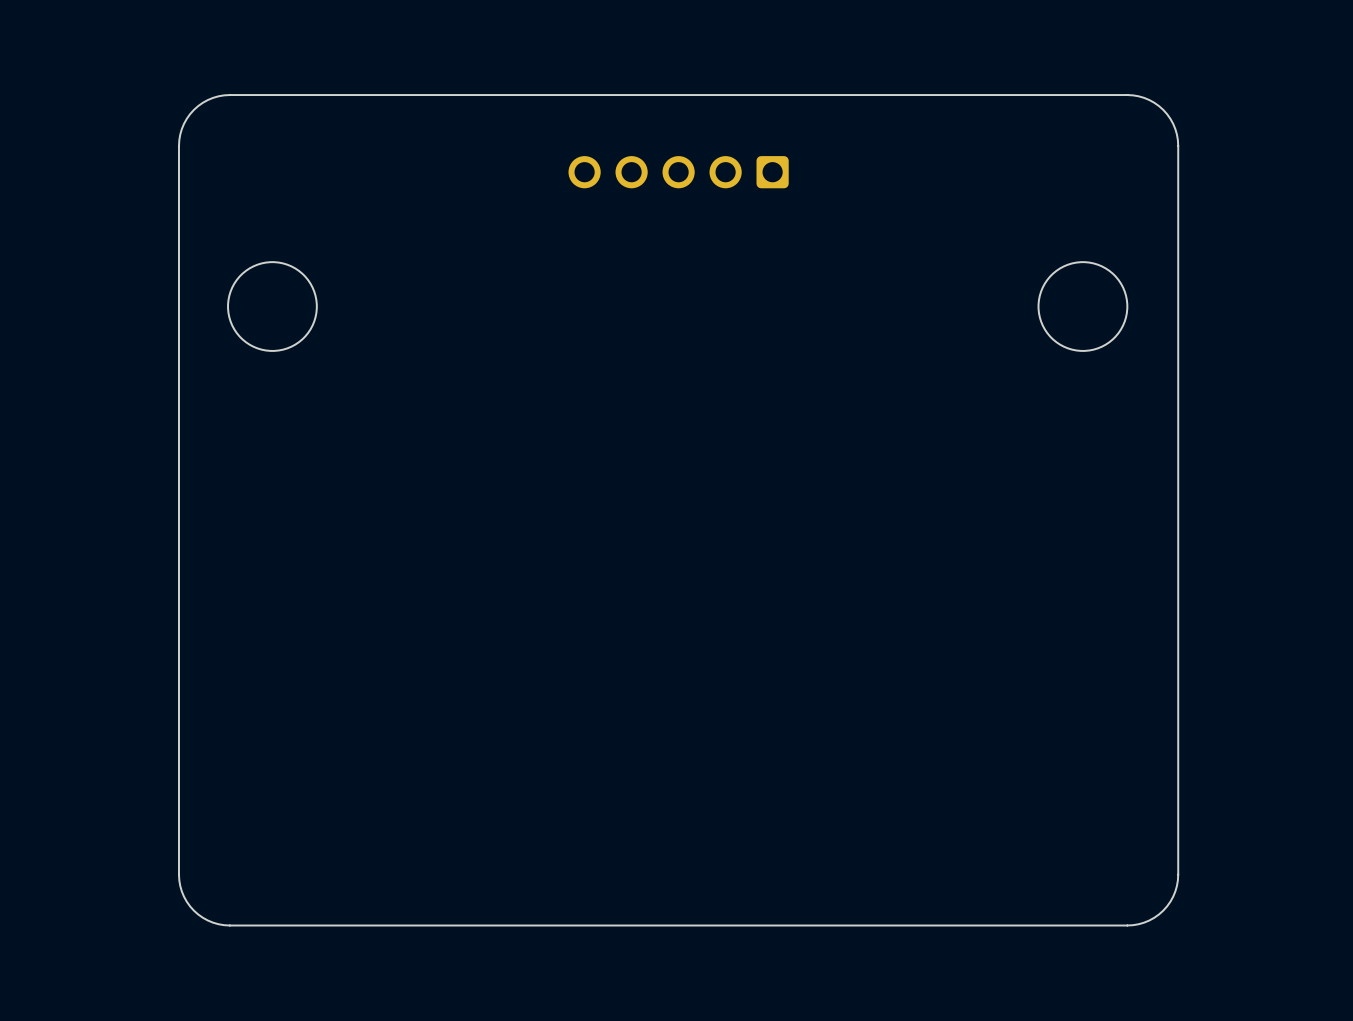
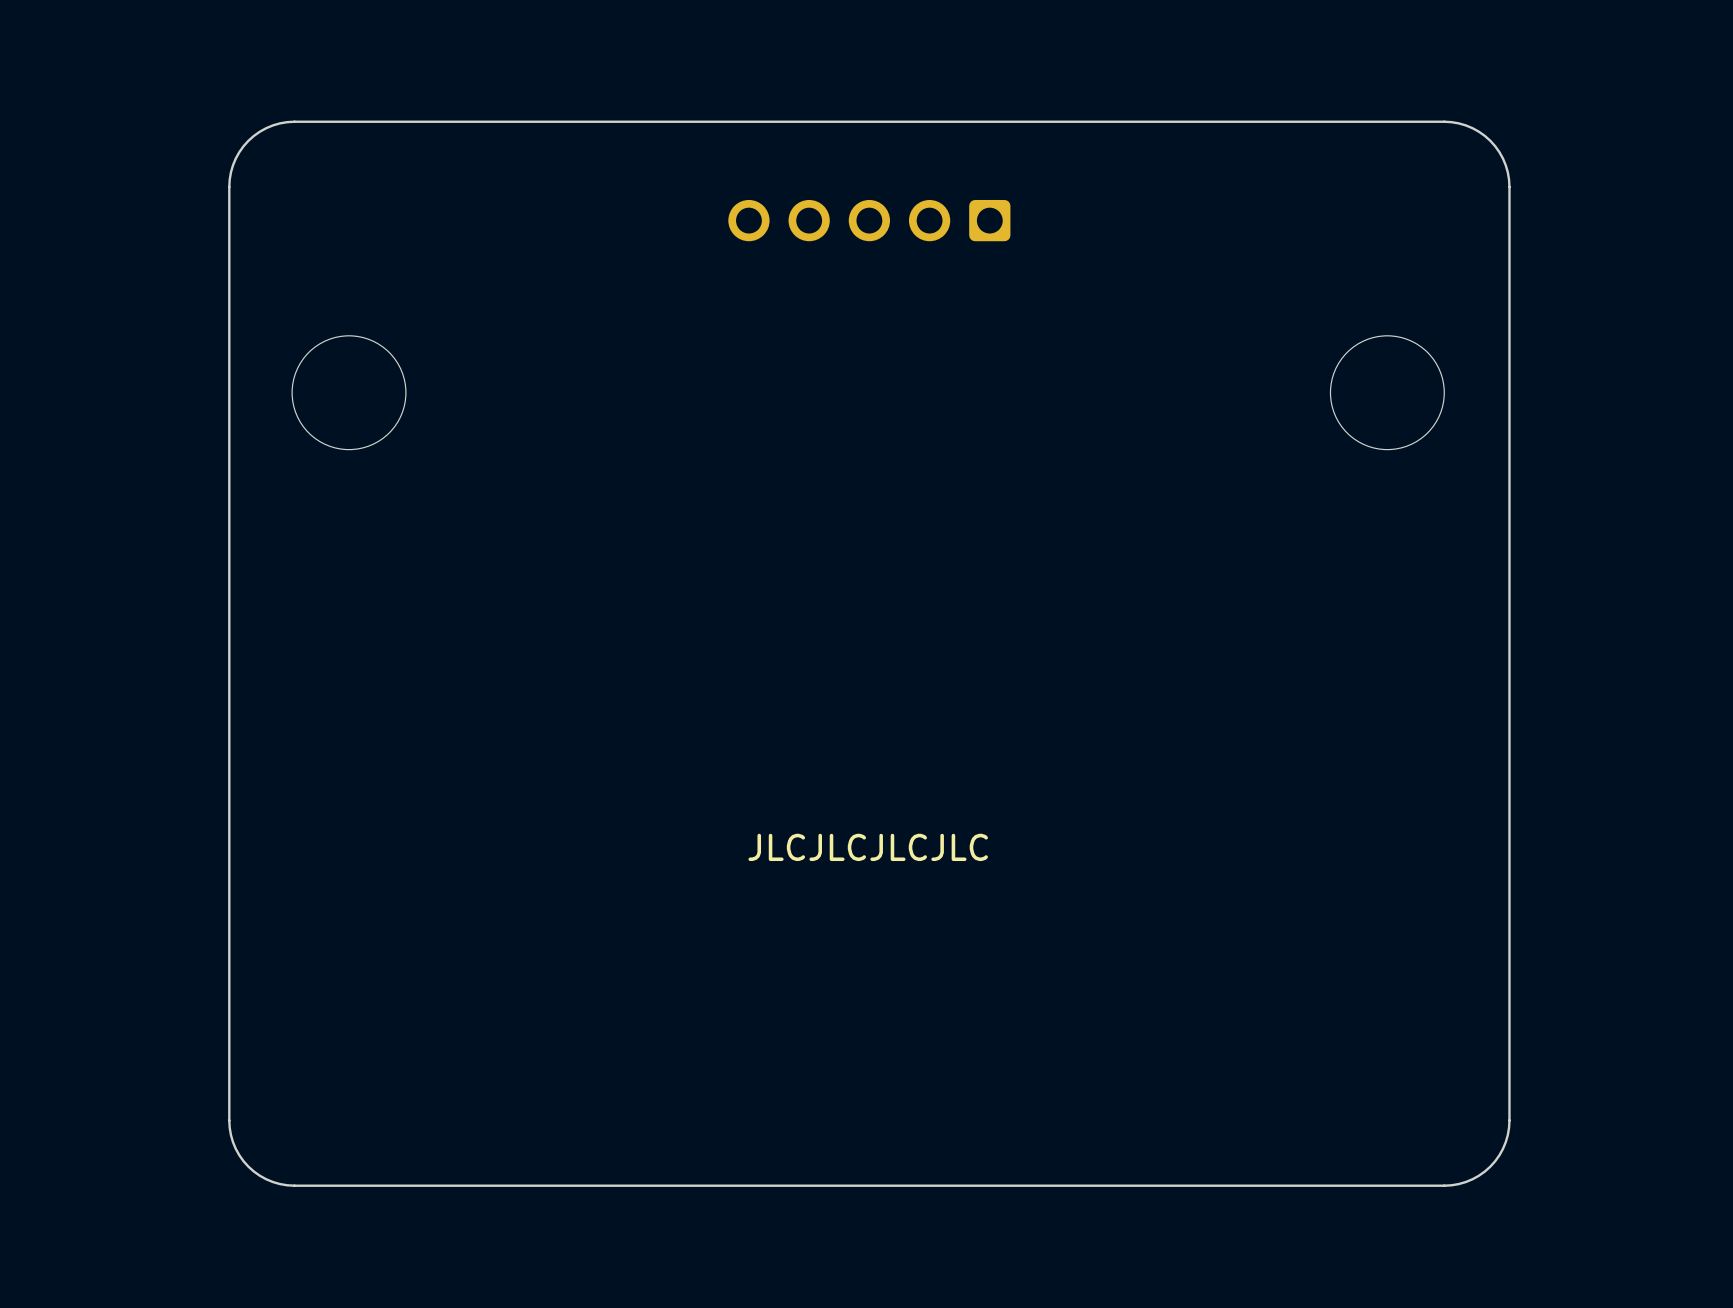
text: none -> JLCJLCJLCJLC (868, 847)

